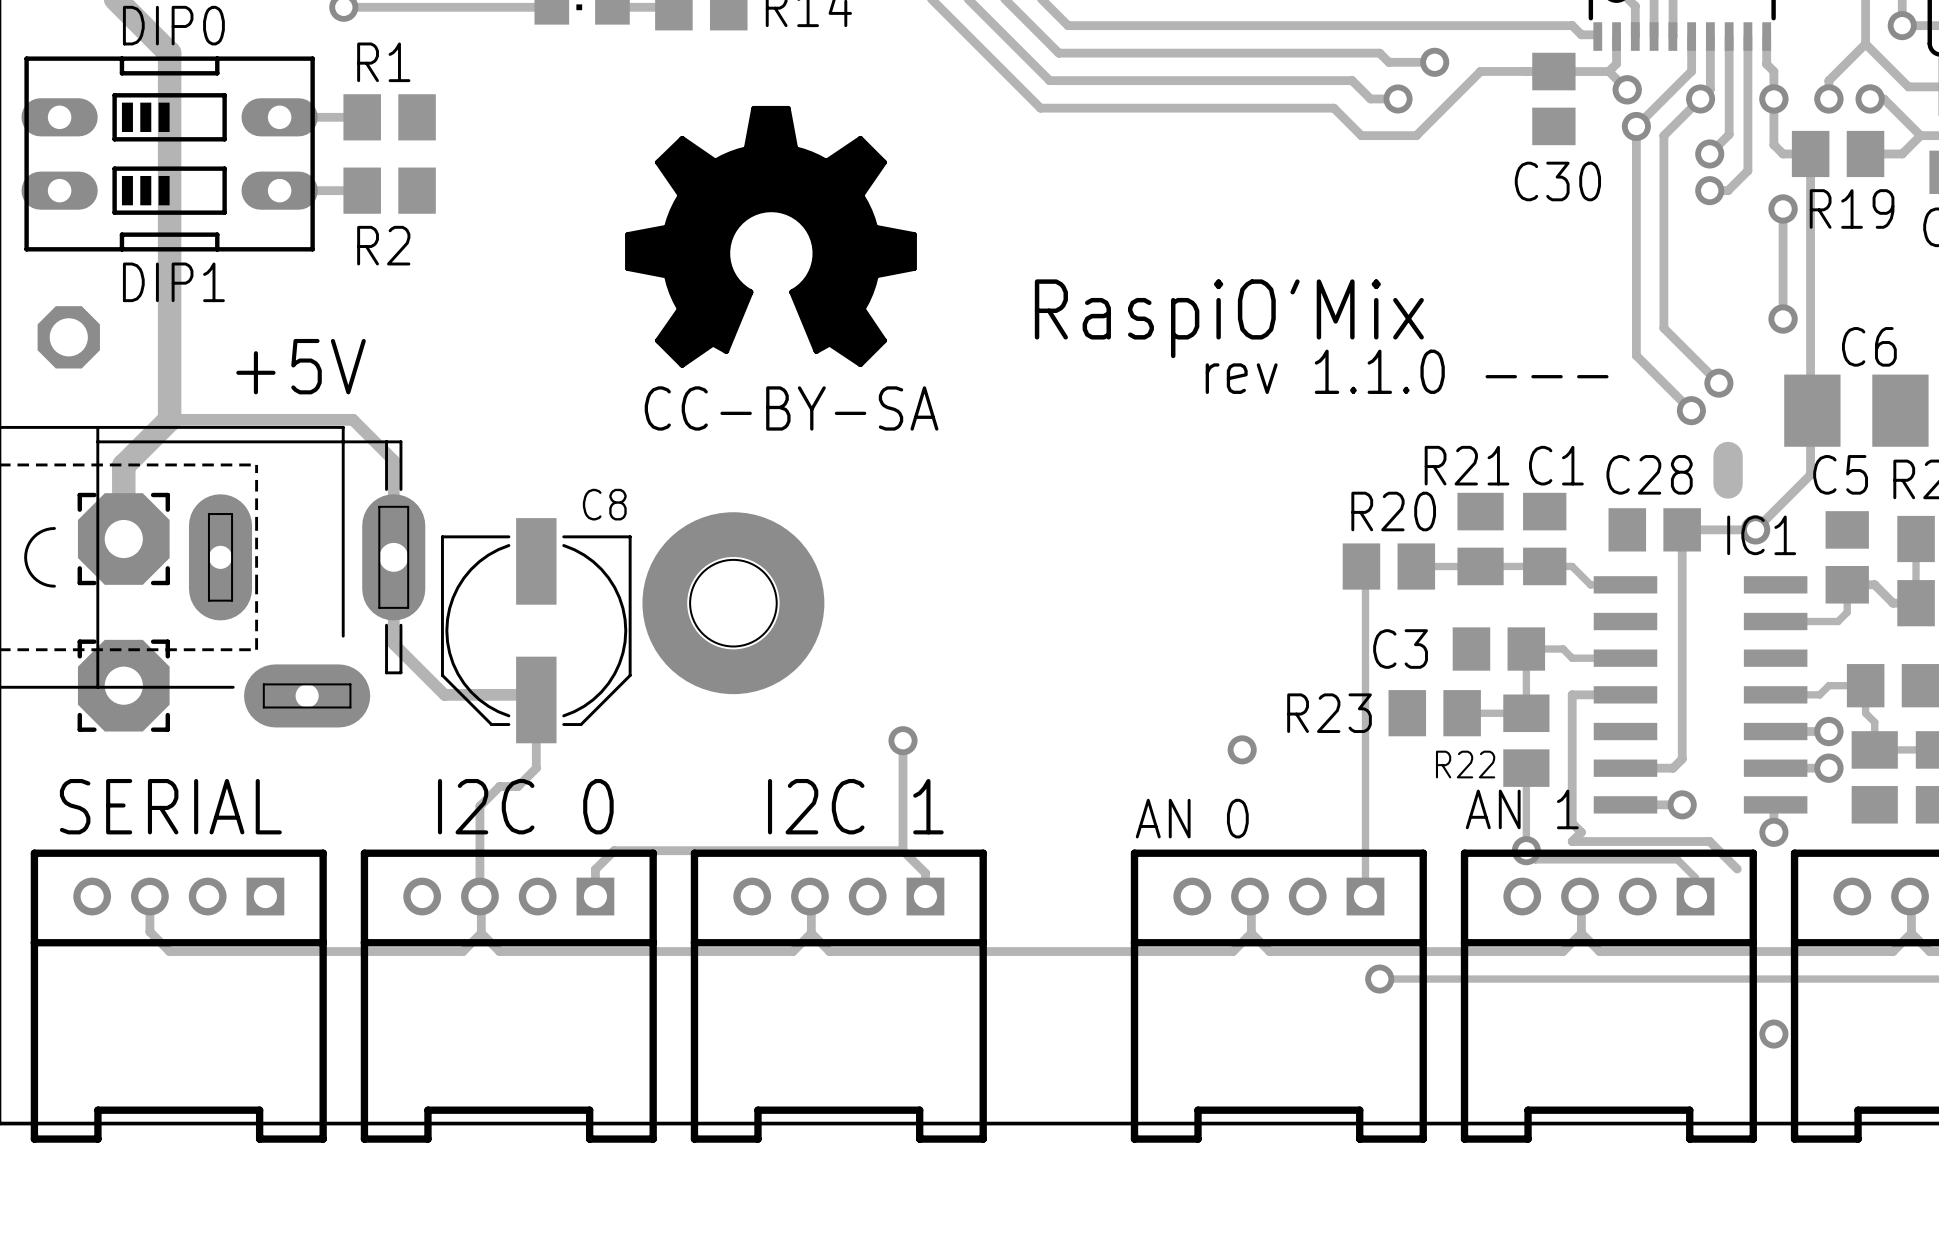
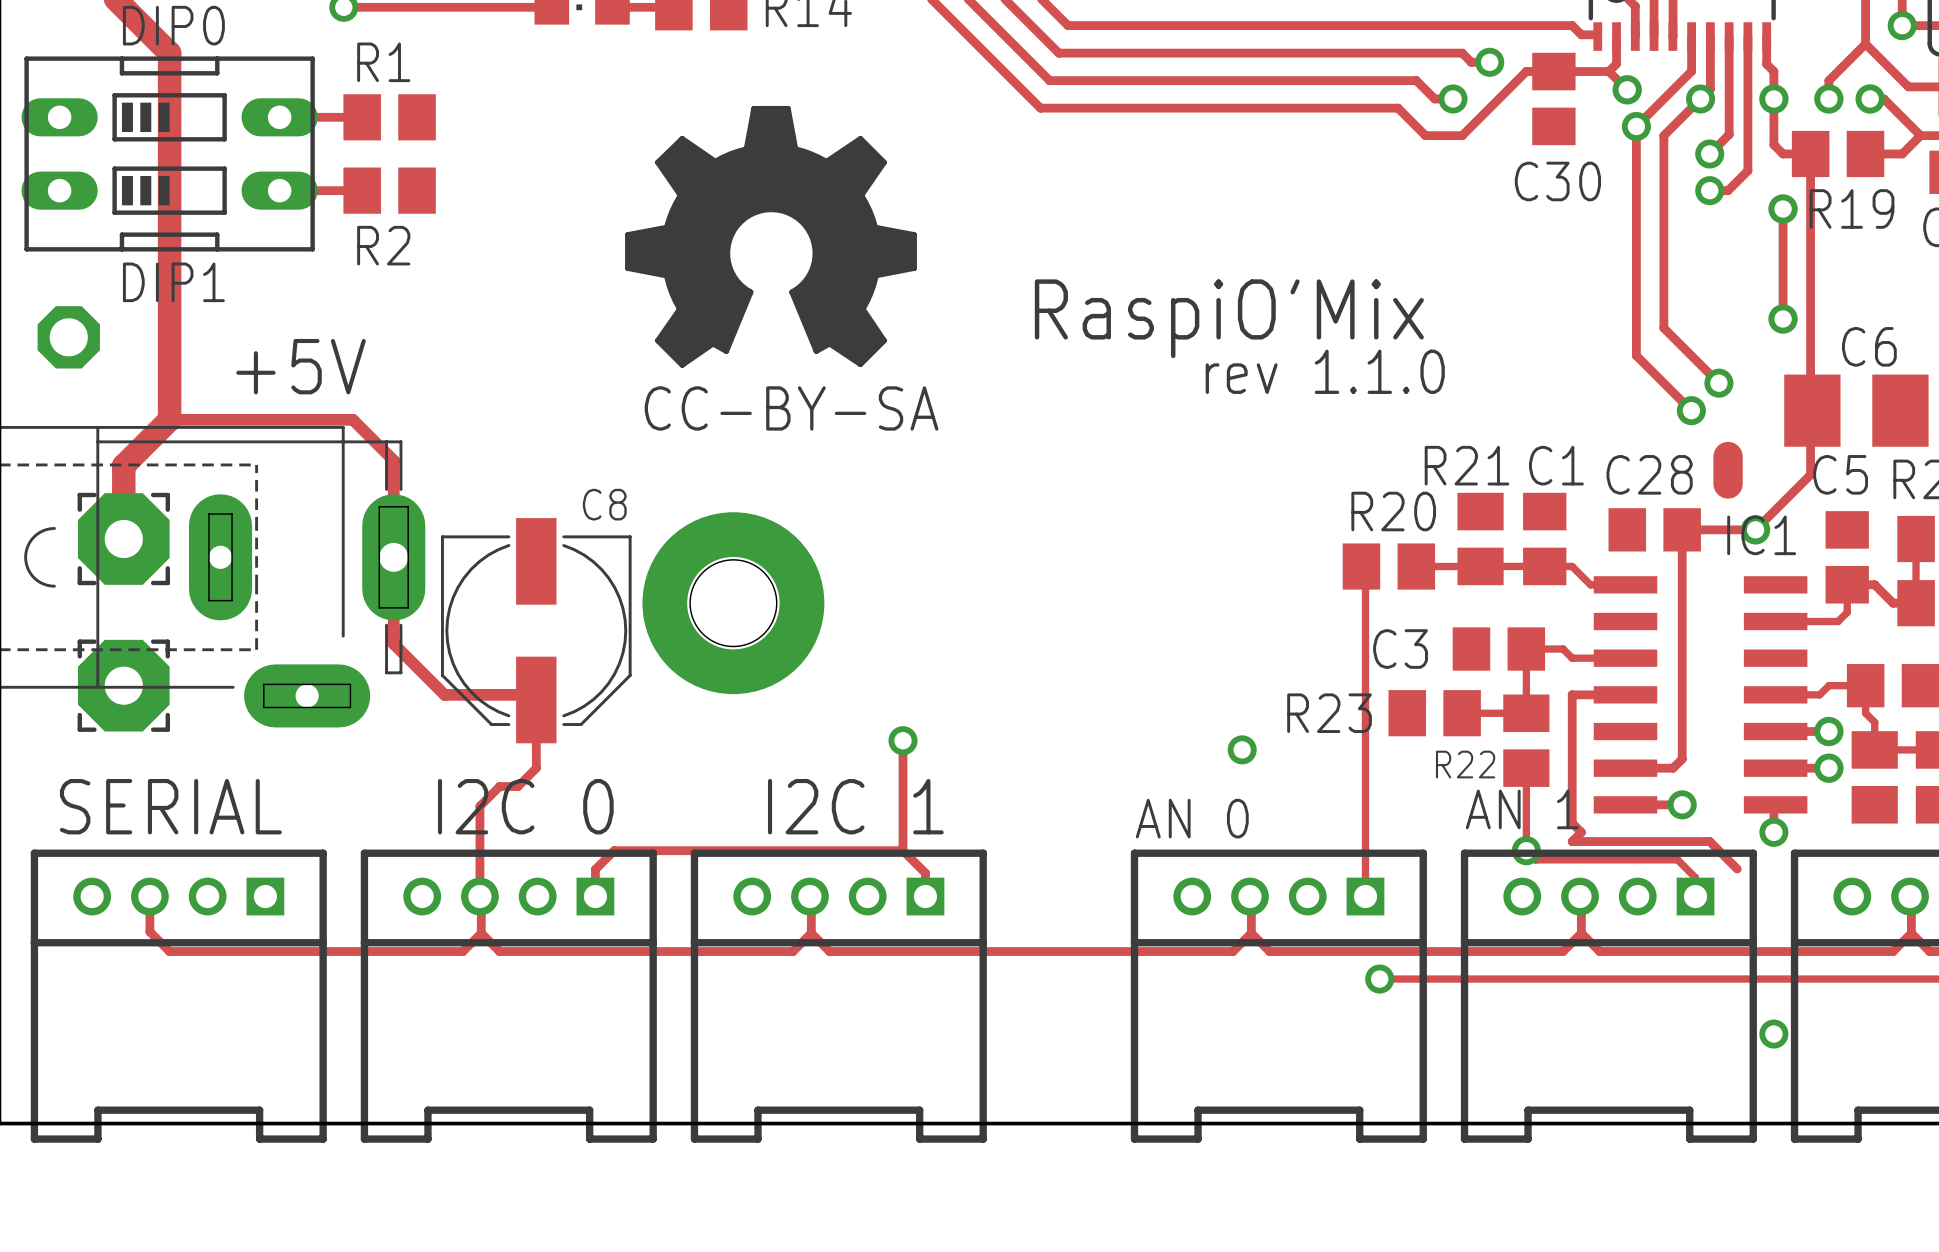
track: (1379, 53) (1388, 62) (1434, 62) -> (1379, 53) (1462, 53) (1471, 62) (1489, 62)
via: (1434, 62) -> none
via: none -> (1489, 62)
track: (1526, 71) (1480, 71) (1416, 135) (1361, 135) (1333, 108) -> (1526, 71) (1462, 135) (1425, 135) (1398, 108) (1333, 108)
track: (1352, 80) (1370, 98) (1398, 98) -> (1352, 80) (1416, 80) (1434, 98) (1453, 98)
via: (1398, 98) -> none
via: none -> (1453, 98)
text: rev 1.1.0 --- (1407, 371) -> rev 1.1.0 (1325, 371)

